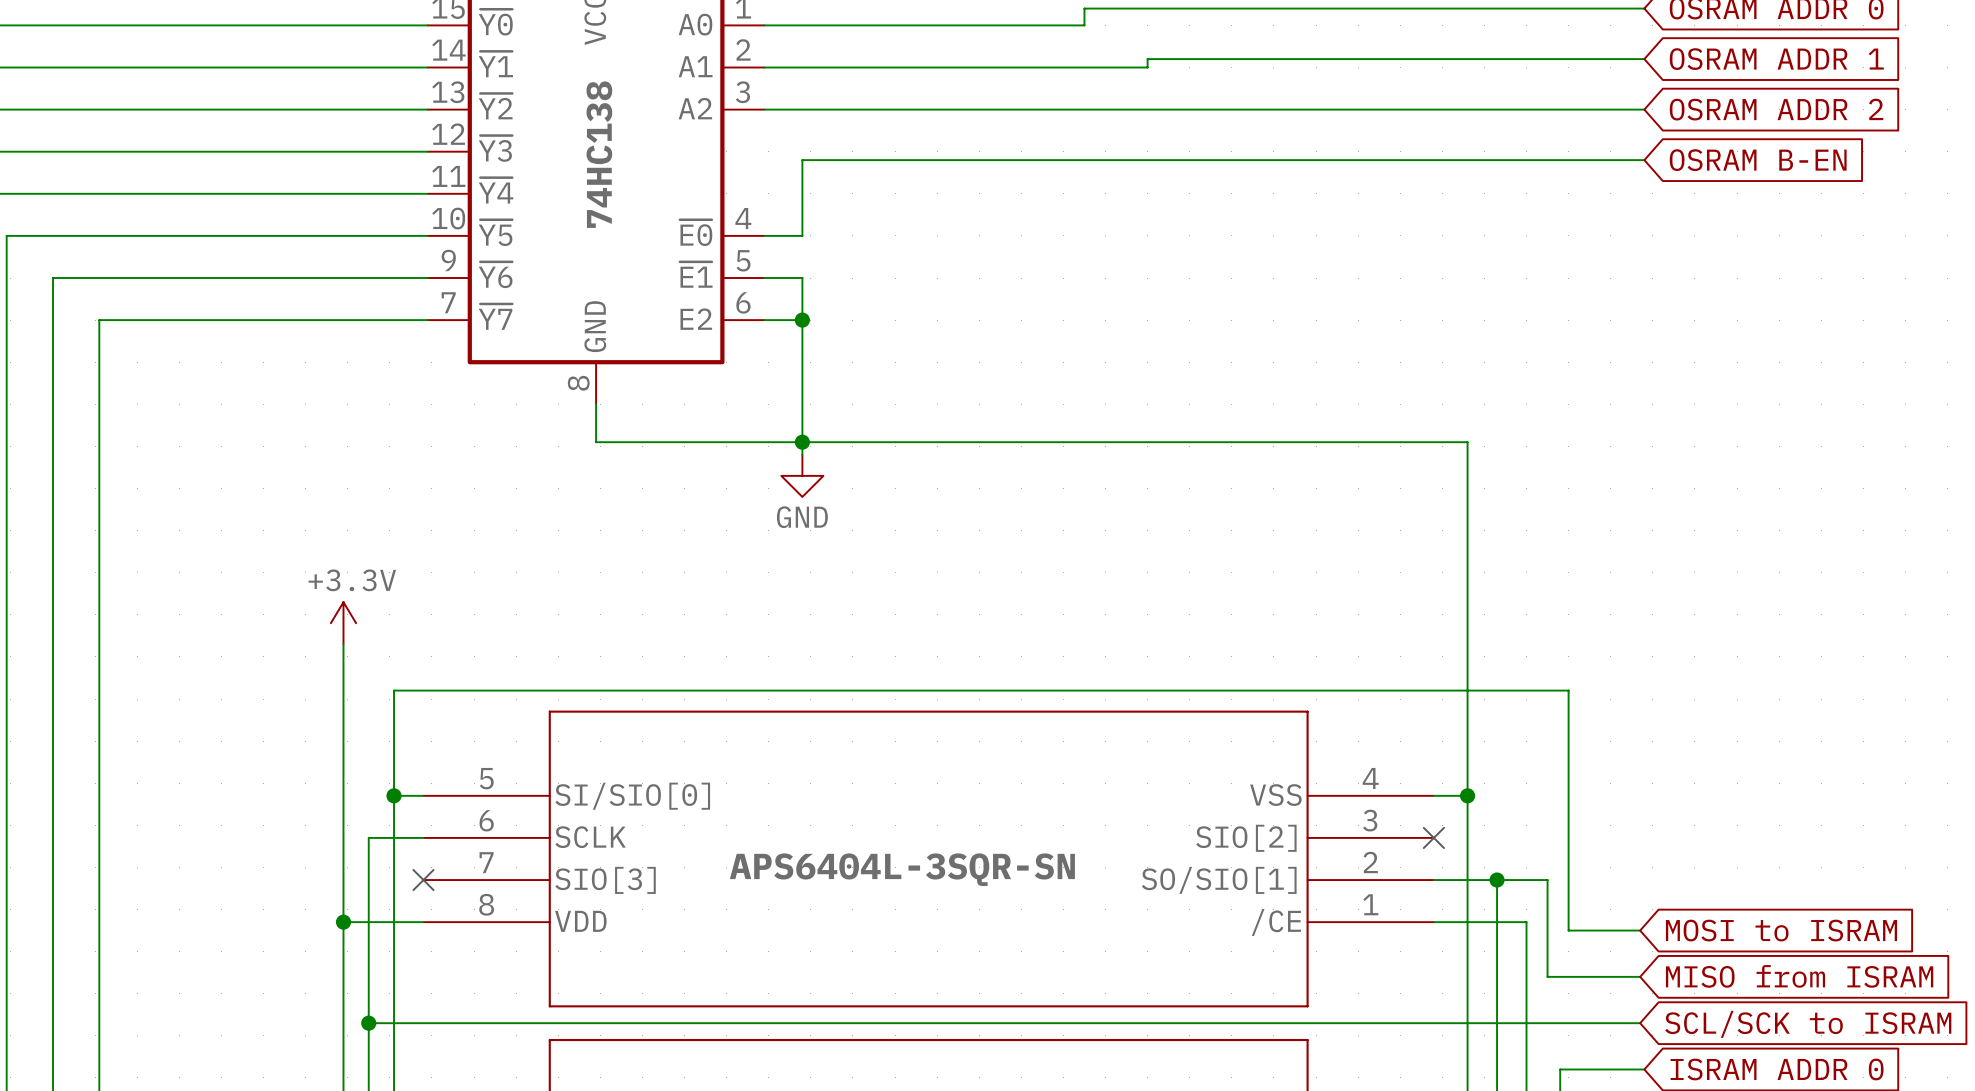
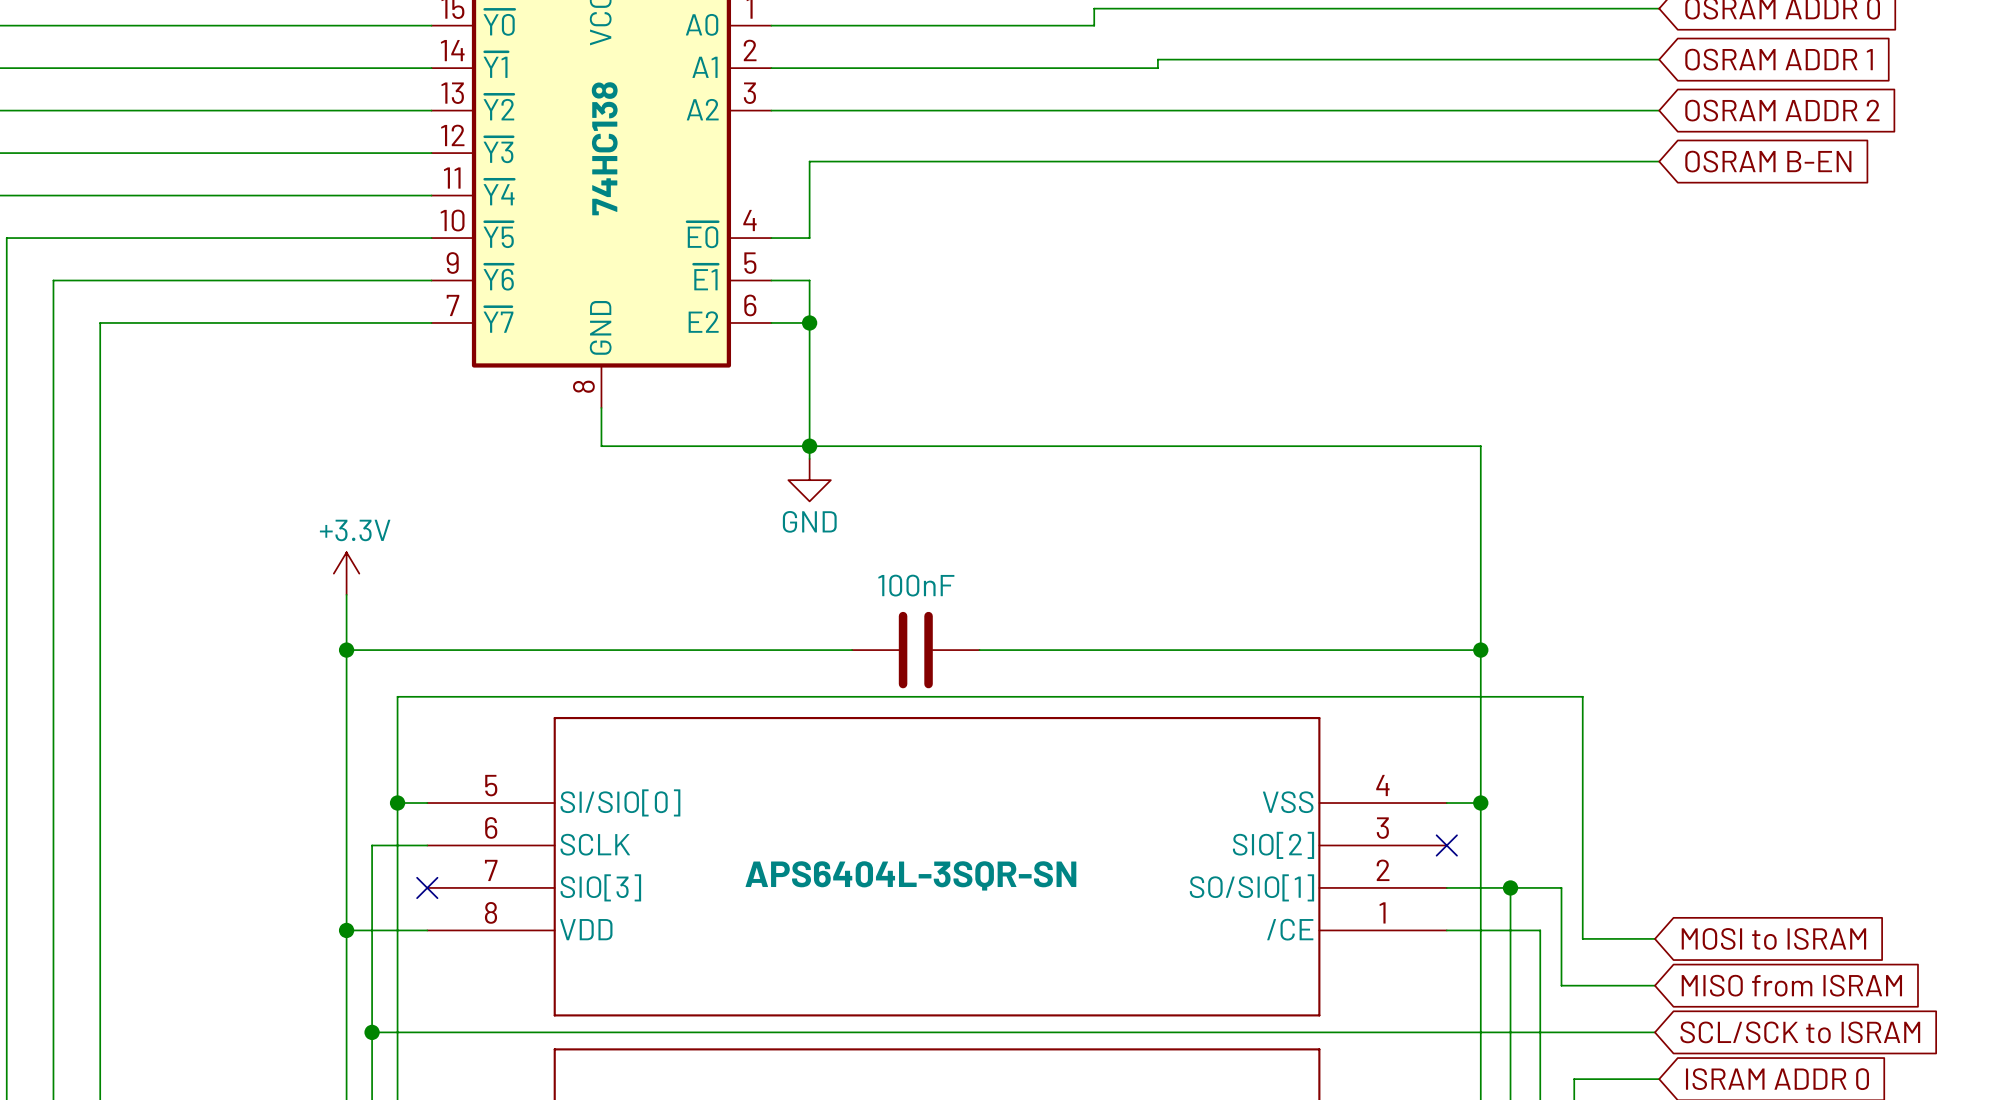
wire: none -> (346, 594) (346, 650) (852, 650)
power symbol position: +3.3V (343, 623) -> +3.3V (346, 573)
junction: none -> (346, 650)
part: none -> 100nF (915, 650)
wire: none -> (979, 650) (1480, 650)
junction: none -> (1480, 650)

